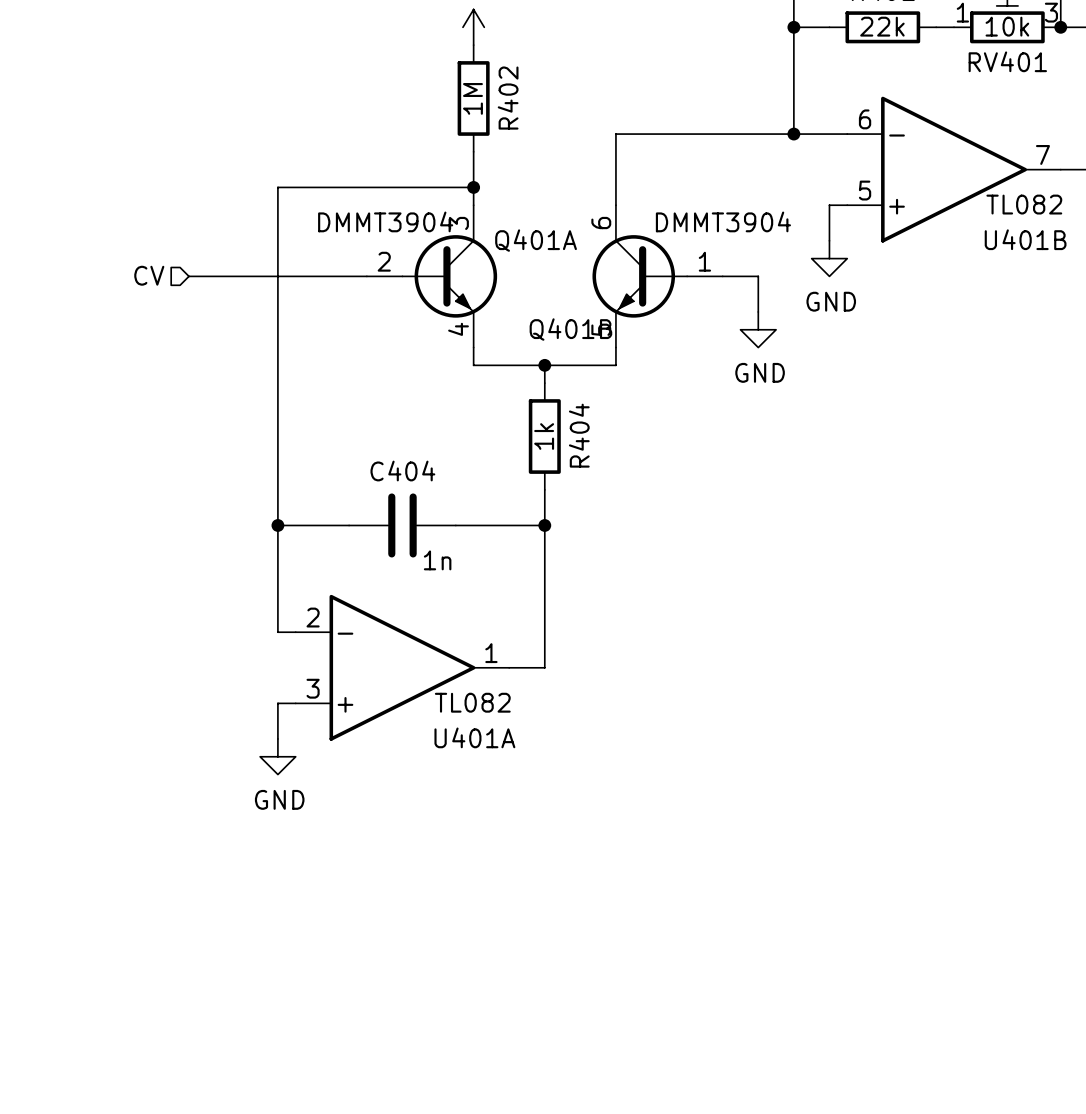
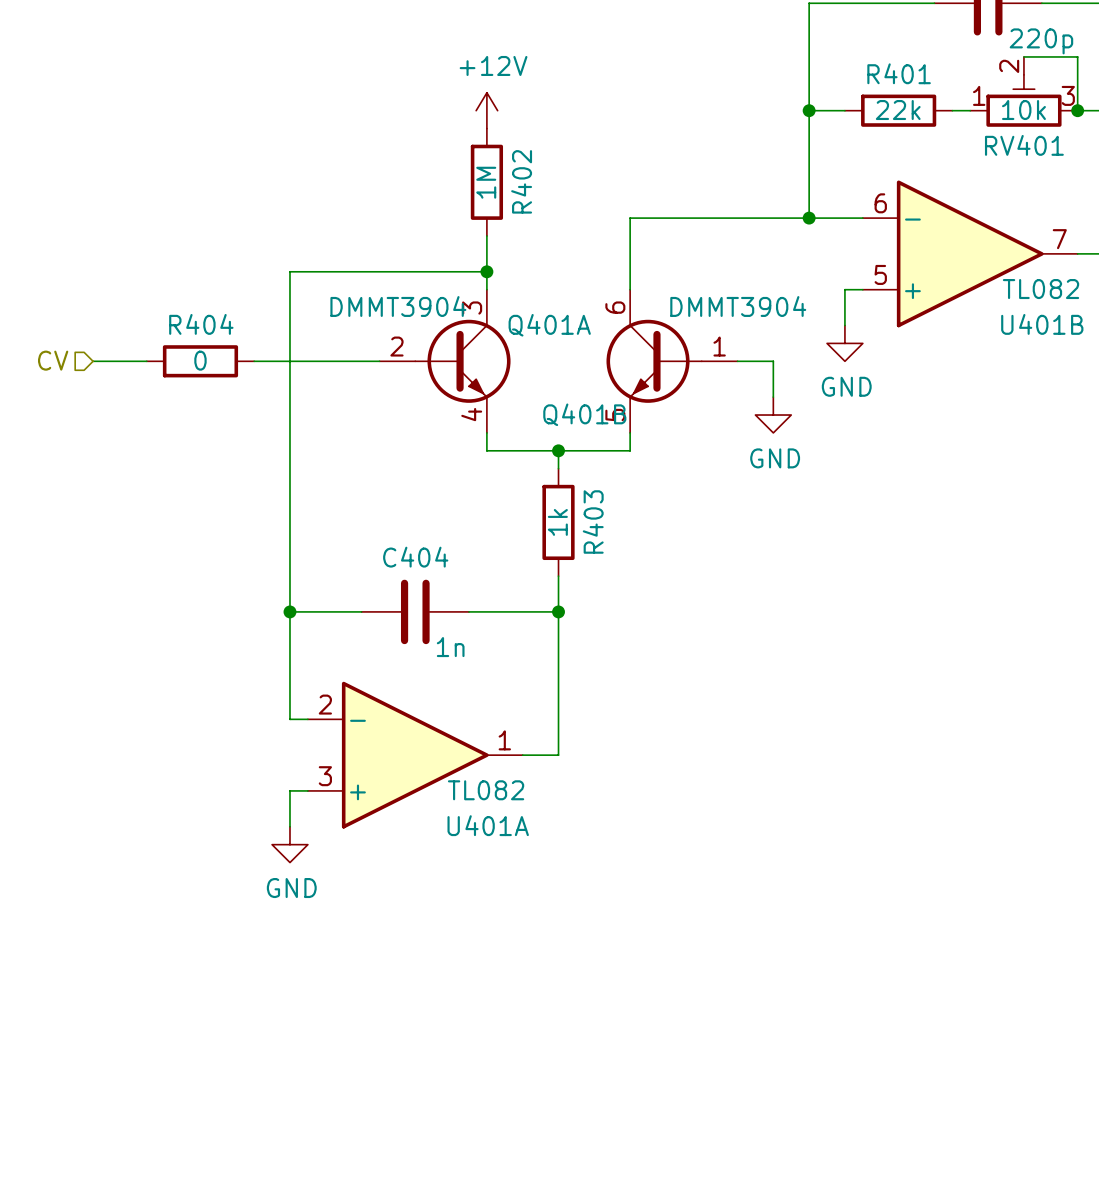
hierarchical label position: CV (149, 275) -> CV (53, 360)
wire: (188, 276) (242, 276) -> (93, 361) (146, 361)
R404: none -> 0 (200, 361)
R404 name: R404 (579, 435) -> R403 (593, 522)

